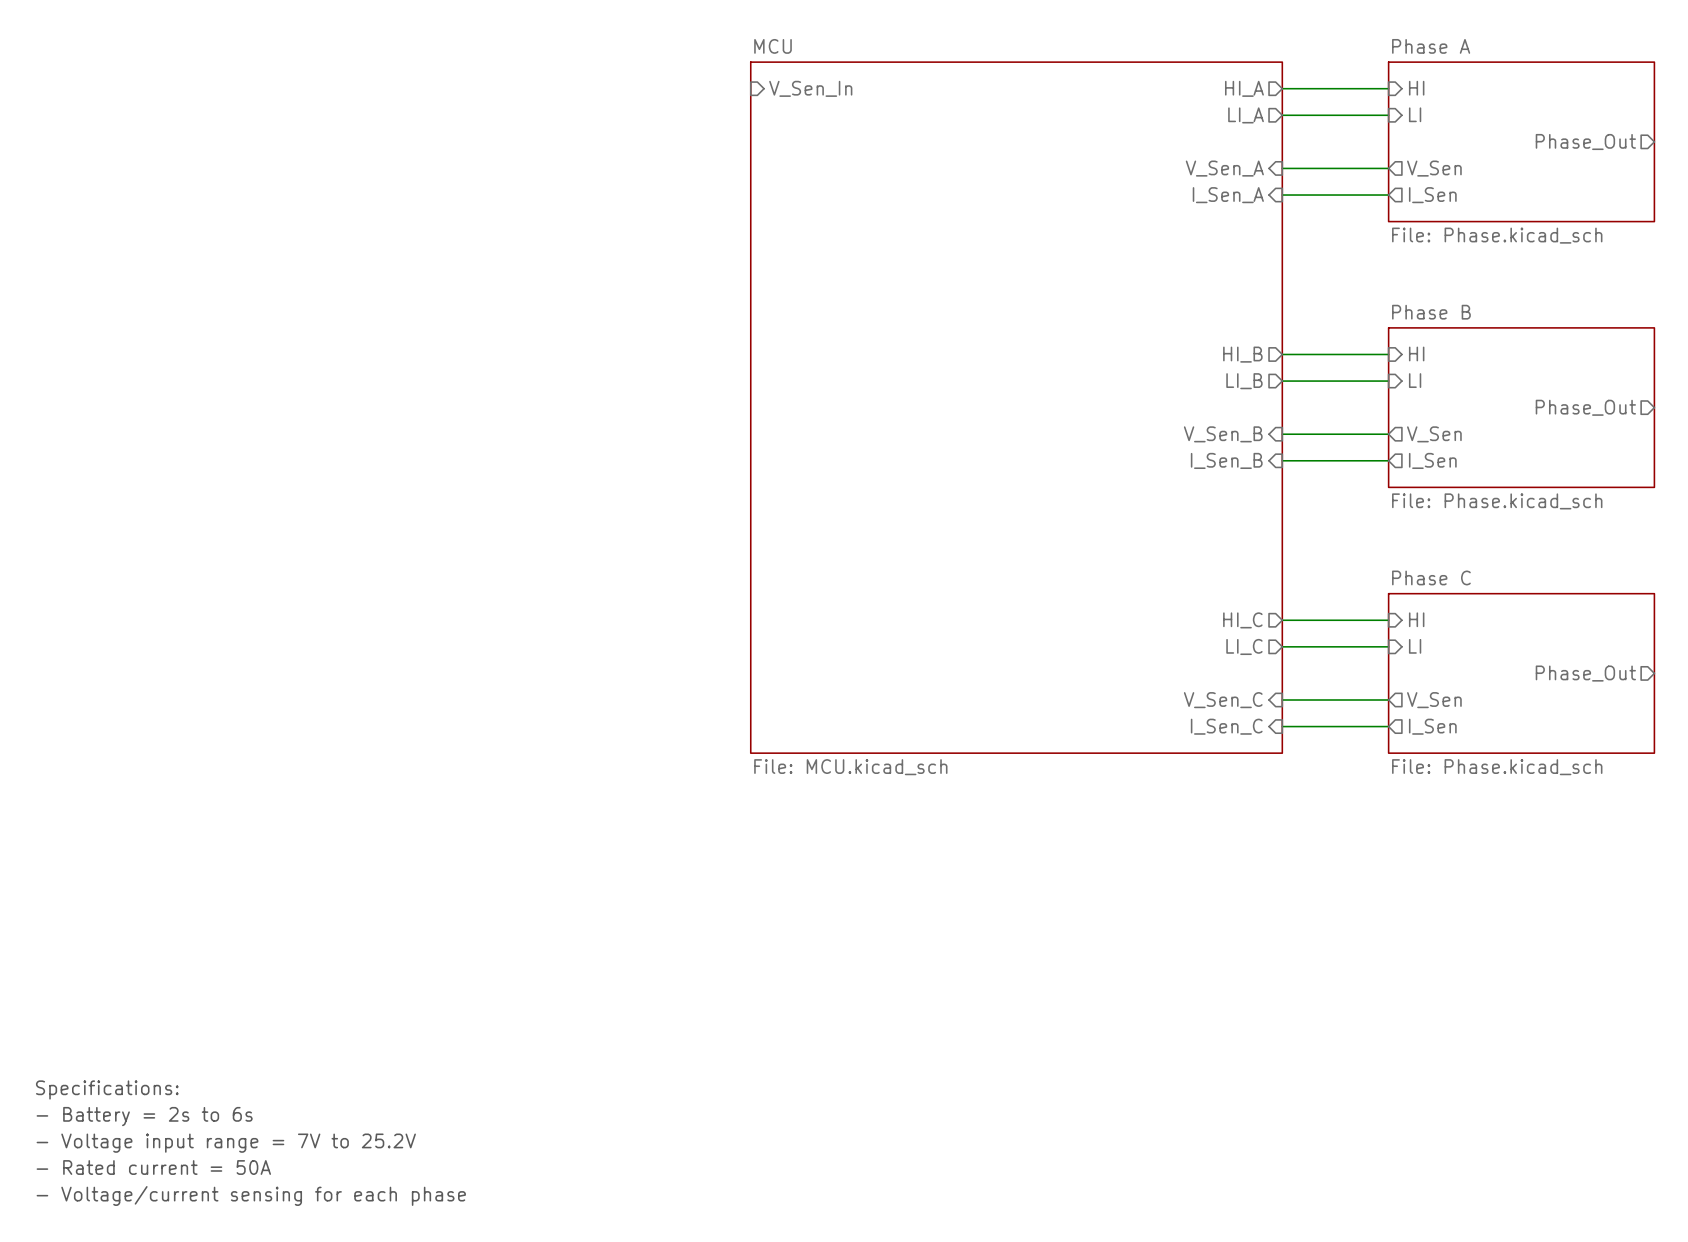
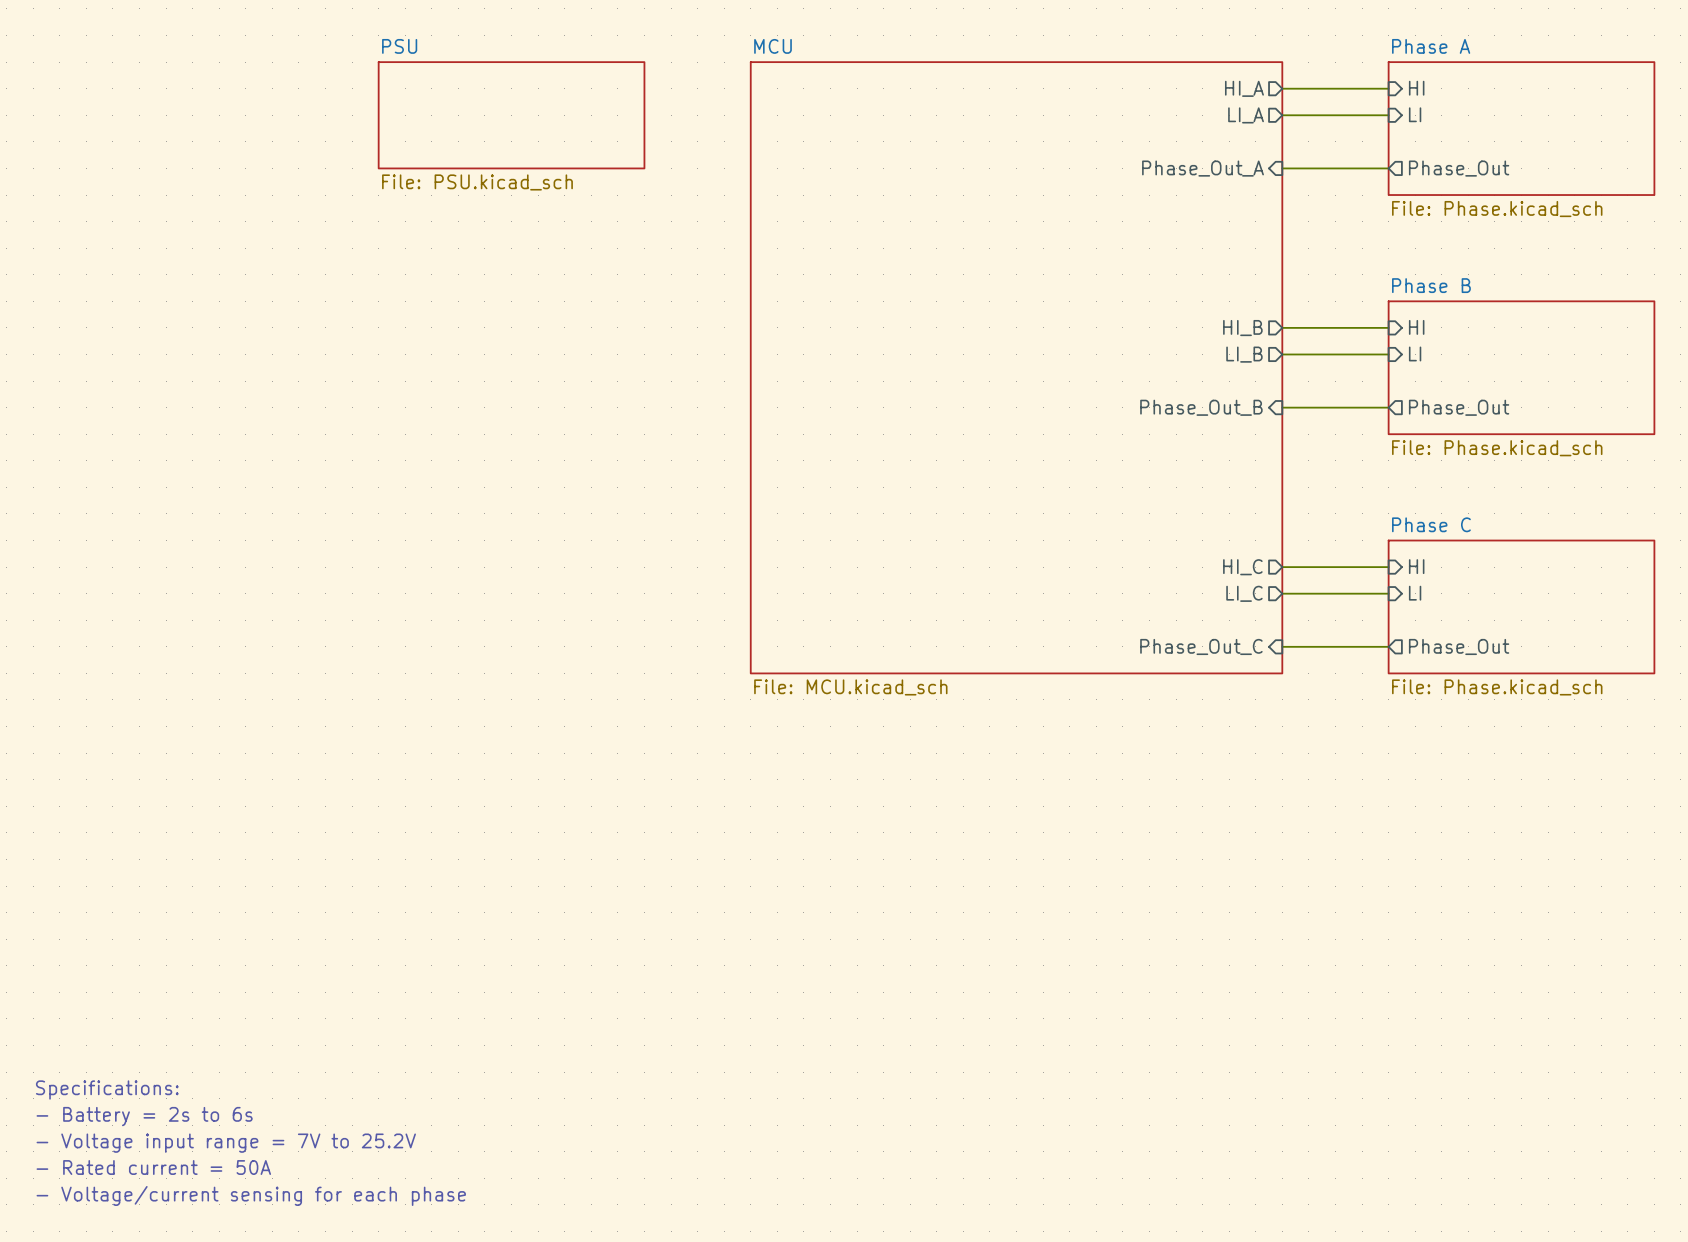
sheet pin: V_Sen_In (810, 88) -> none
sheet PSU: none -> File: PSU.kicad_sch (511, 115)
sheet Phase A: none -> File: Phase.kicad_sch (1521, 128)
sheet Phase A: File: Phase.kicad_sch (1521, 141) -> none
sheet pin: Phase_Out (1585, 141) -> none
sheet pin: V_Sen_A (1224, 168) -> Phase_Out_A (1203, 168)
sheet pin: V_Sen (1434, 168) -> Phase_Out (1459, 168)
sheet pin: I_Sen_A (1228, 195) -> none
wire: (1282, 195) (1388, 195) -> none
sheet pin: I_Sen (1432, 195) -> none
sheet pin: none -> HI (1416, 327)
sheet pin: none -> HI_B (1242, 328)
sheet pin: HI (1416, 353) -> LI (1415, 353)
sheet pin: HI_B (1242, 354) -> LI_B (1244, 354)
sheet MCU: none -> File: MCU.kicad_sch (1016, 367)
sheet Phase B: none -> File: Phase.kicad_sch (1521, 367)
sheet pin position: LI (1415, 380) -> LI (1415, 593)
sheet pin: LI_B (1244, 381) -> none
wire: (1282, 381) (1388, 381) -> (1282, 327) (1388, 327)
sheet MCU: File: MCU.kicad_sch (1016, 407) -> none
sheet pin: none -> Phase_Out_B (1201, 407)
sheet Phase B: File: Phase.kicad_sch (1521, 407) -> none
sheet pin rotation: 0° (1585, 407) -> 180° (1459, 407)
sheet pin: V_Sen_B (1223, 434) -> none
wire: (1282, 434) (1388, 434) -> none
sheet pin: V_Sen (1434, 434) -> none
sheet pin: I_Sen_B (1226, 460) -> none
wire: (1282, 460) (1388, 460) -> (1282, 407) (1388, 407)
sheet pin: I_Sen (1432, 460) -> none
sheet pin: none -> LI_C (1244, 593)
sheet Phase C: none -> File: Phase.kicad_sch (1521, 606)
sheet pin position: HI (1416, 619) -> HI (1416, 566)
sheet pin position: HI_C (1242, 620) -> HI_C (1242, 567)
wire: (1282, 620) (1388, 620) -> (1282, 567) (1388, 567)
sheet pin shape: output (1244, 646) -> input (1201, 646)
sheet pin: LI_C (1244, 646) -> Phase_Out_C (1201, 646)
sheet pin shape: input (1415, 646) -> output (1459, 646)
sheet pin: LI (1415, 646) -> Phase_Out (1459, 646)
sheet Phase C: File: Phase.kicad_sch (1521, 673) -> none
sheet pin: Phase_Out (1585, 673) -> none
wire: (1282, 699) (1388, 699) -> none
sheet pin: V_Sen_C (1223, 700) -> none
sheet pin: V_Sen (1434, 700) -> none
sheet pin: I_Sen_C (1226, 726) -> none
wire: (1282, 726) (1388, 726) -> (1282, 593) (1388, 593)
sheet pin: I_Sen (1432, 726) -> none

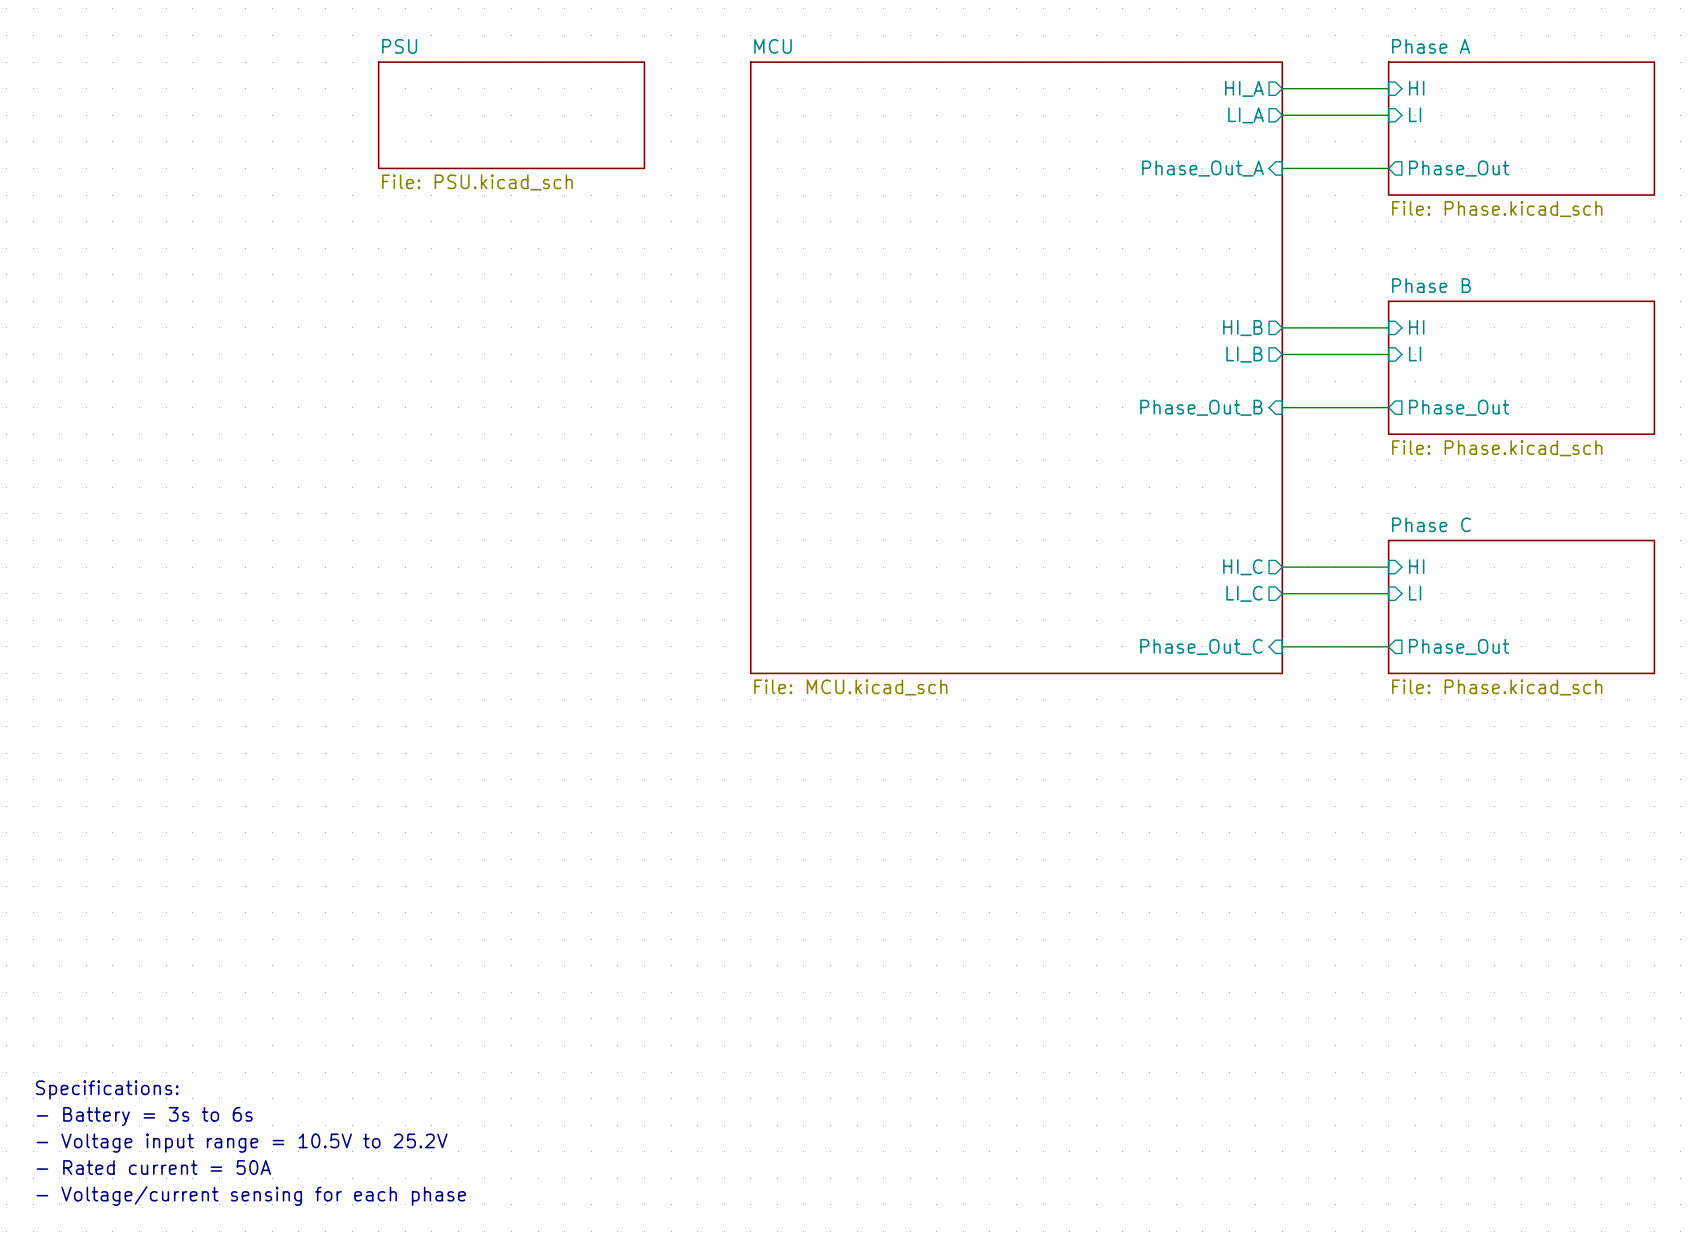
text: - Battery = 2s to 6s (144, 1116) -> - Battery = 3s to 6s (144, 1116)
text: - Voltage input range = 7V to 25.2V (226, 1143) -> - Voltage input range = 10.5V to 25.2V (242, 1143)

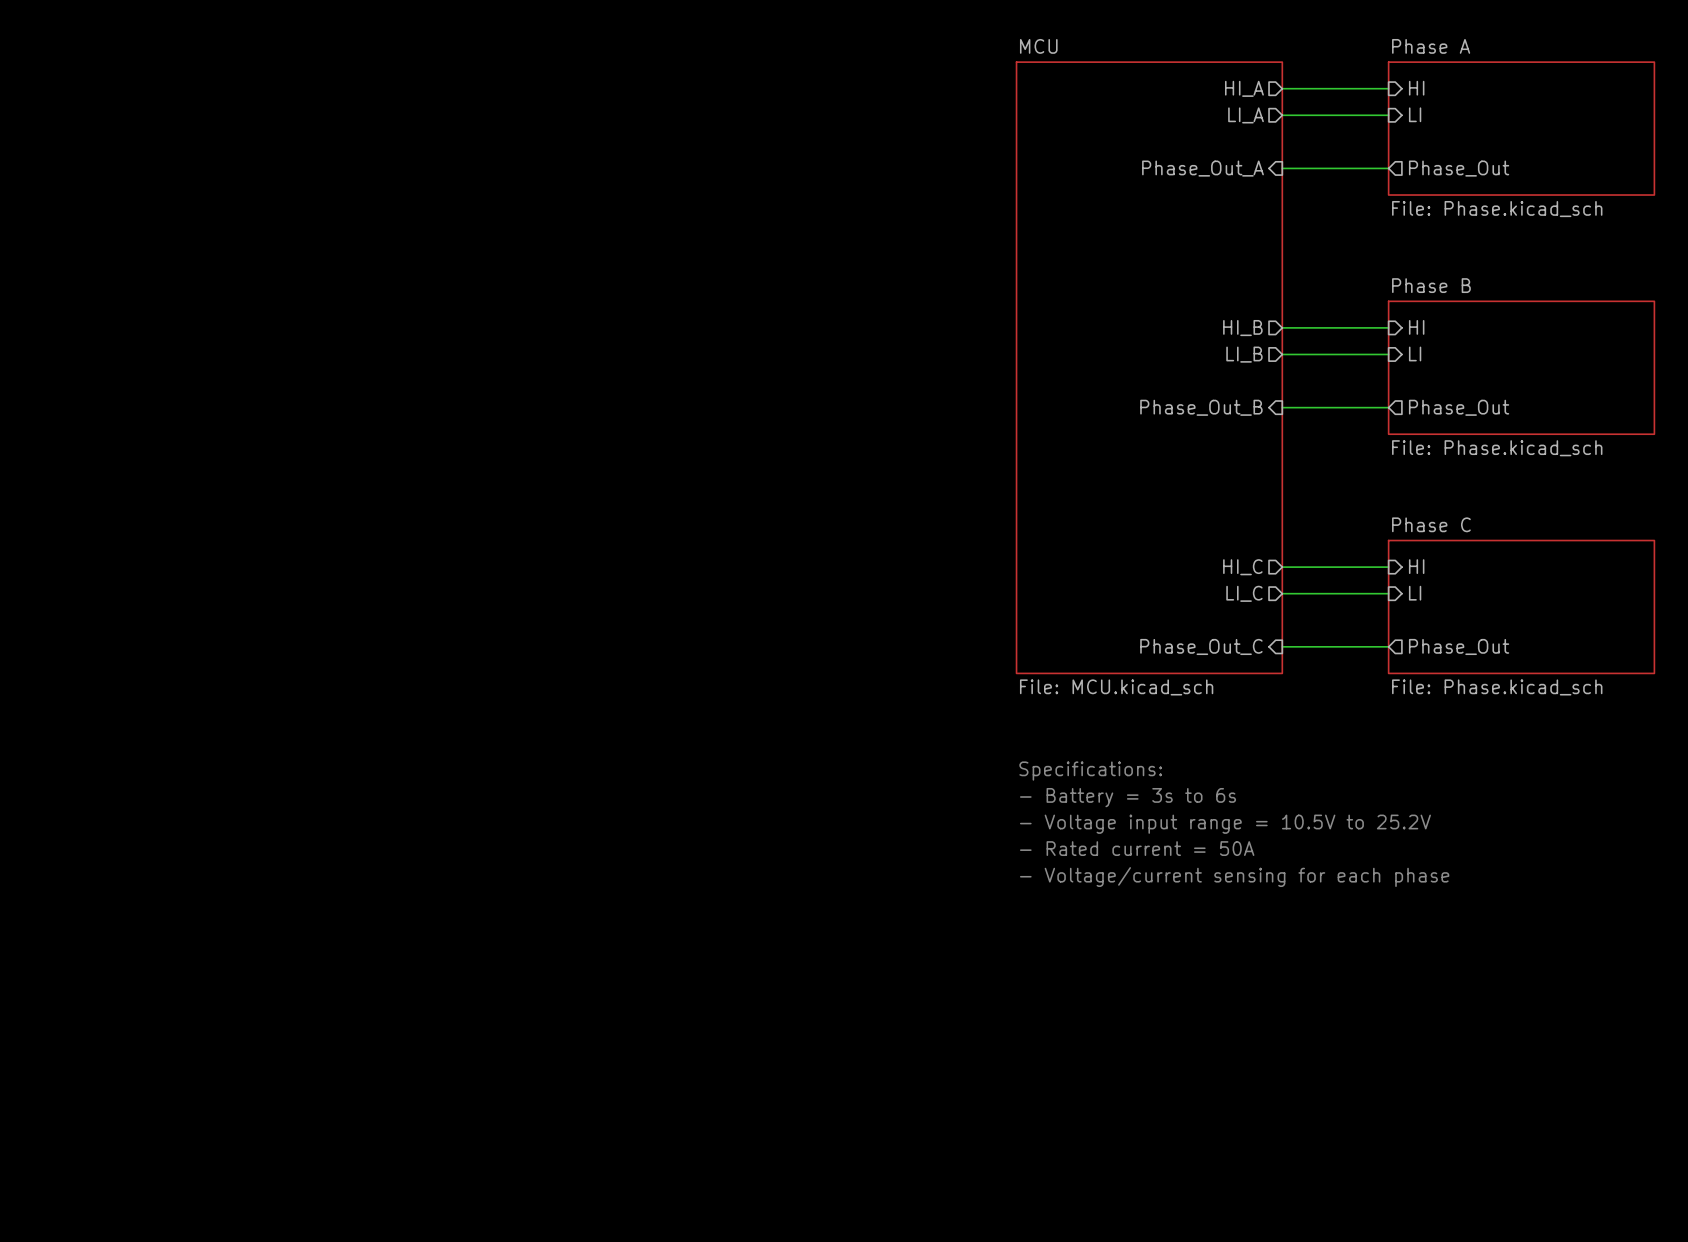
sheet PSU: File: PSU.kicad_sch (511, 115) -> none
sheet MCU: File: MCU.kicad_sch (1016, 367) -> none
sheet MCU: none -> File: MCU.kicad_sch (1149, 367)
text: none -> Specifications: (1090, 771)
text: none -> - Battery = 3s to 6s (1128, 797)
text: none -> - Voltage input range = 10.5V to 25.2V (1225, 824)
text: none -> - Rated current = 50A (1137, 848)
text: none -> - Voltage/current sensing for each phase (1234, 877)
text: Specifications: (107, 1089) -> none
text: - Battery = 3s to 6s (144, 1116) -> none
text: - Voltage input range = 10.5V to 25.2V (242, 1143) -> none
text: - Rated current = 50A (153, 1167) -> none
text: - Voltage/current sensing for each phase (251, 1195) -> none

